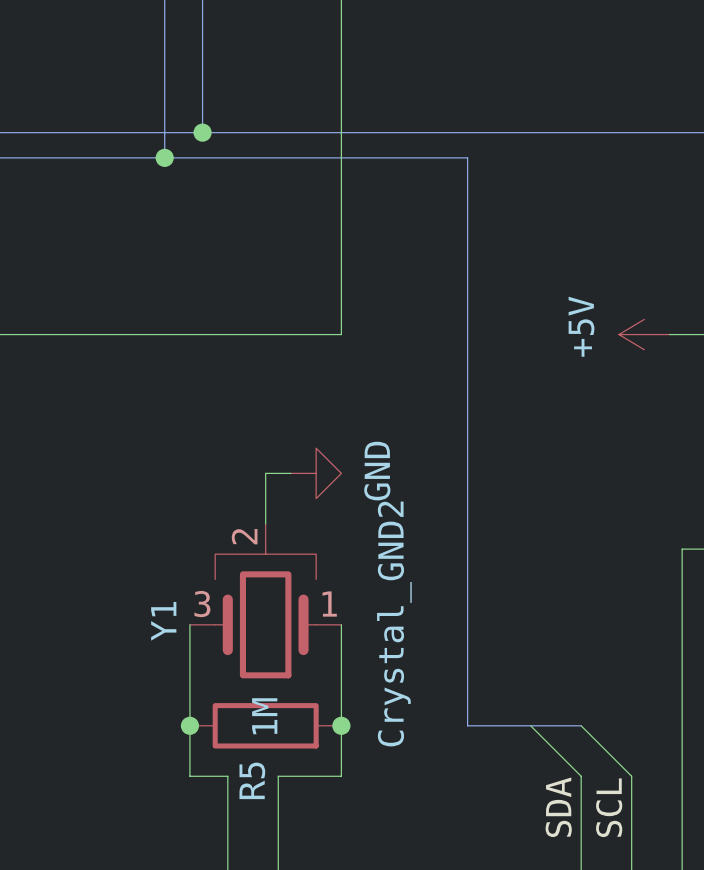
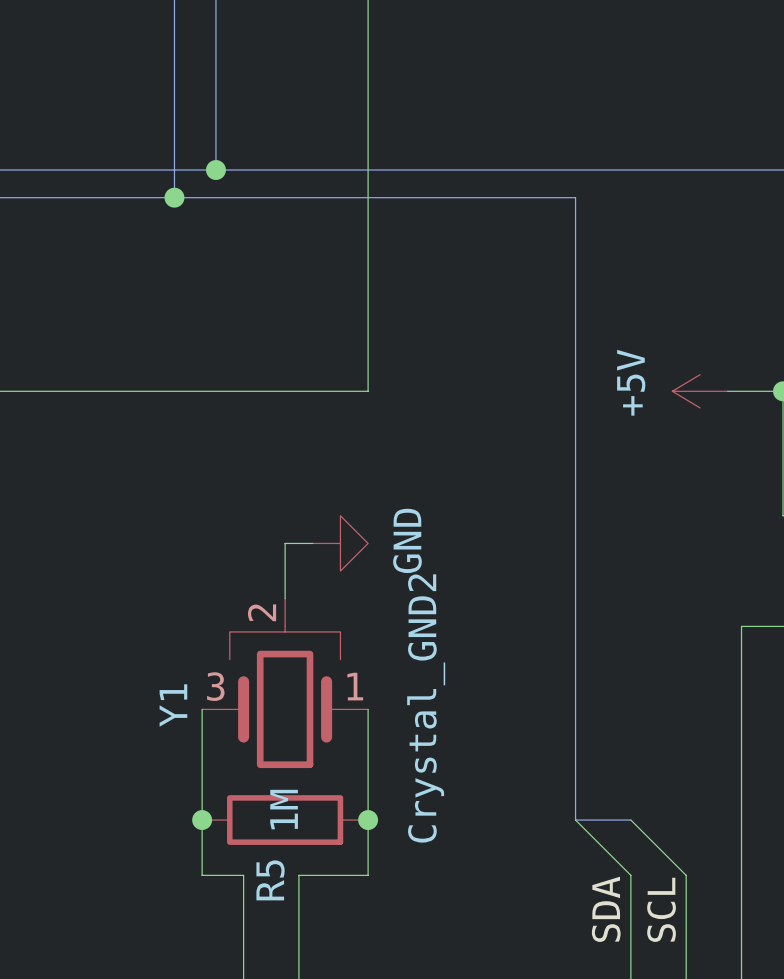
bus: (467, 157) (467, 725) (530, 725) -> (506, 197) (575, 197) (575, 820)

